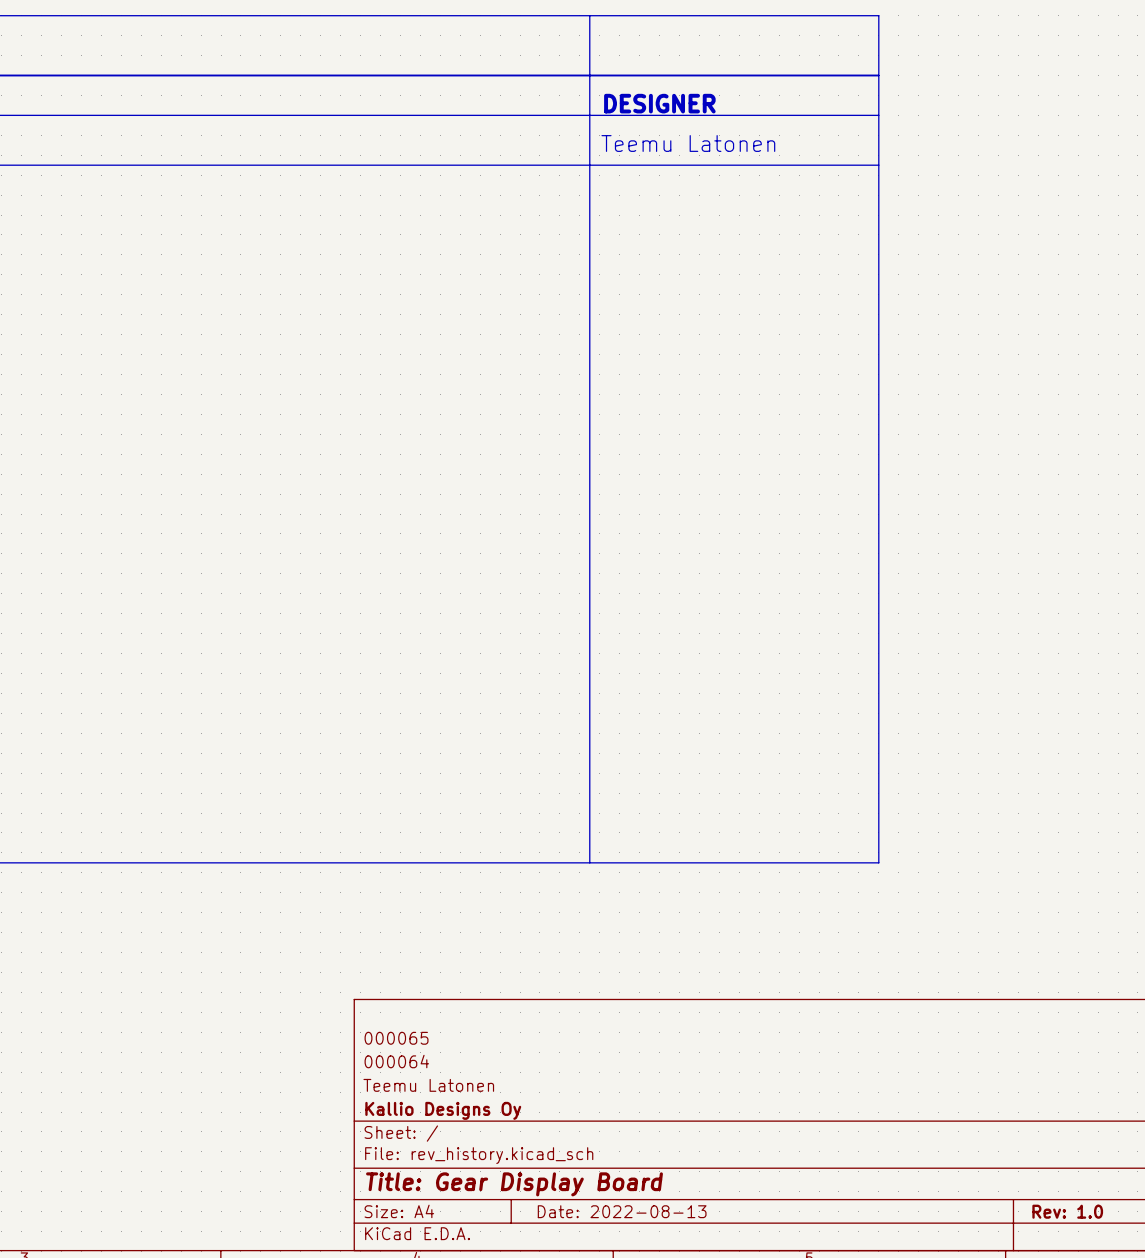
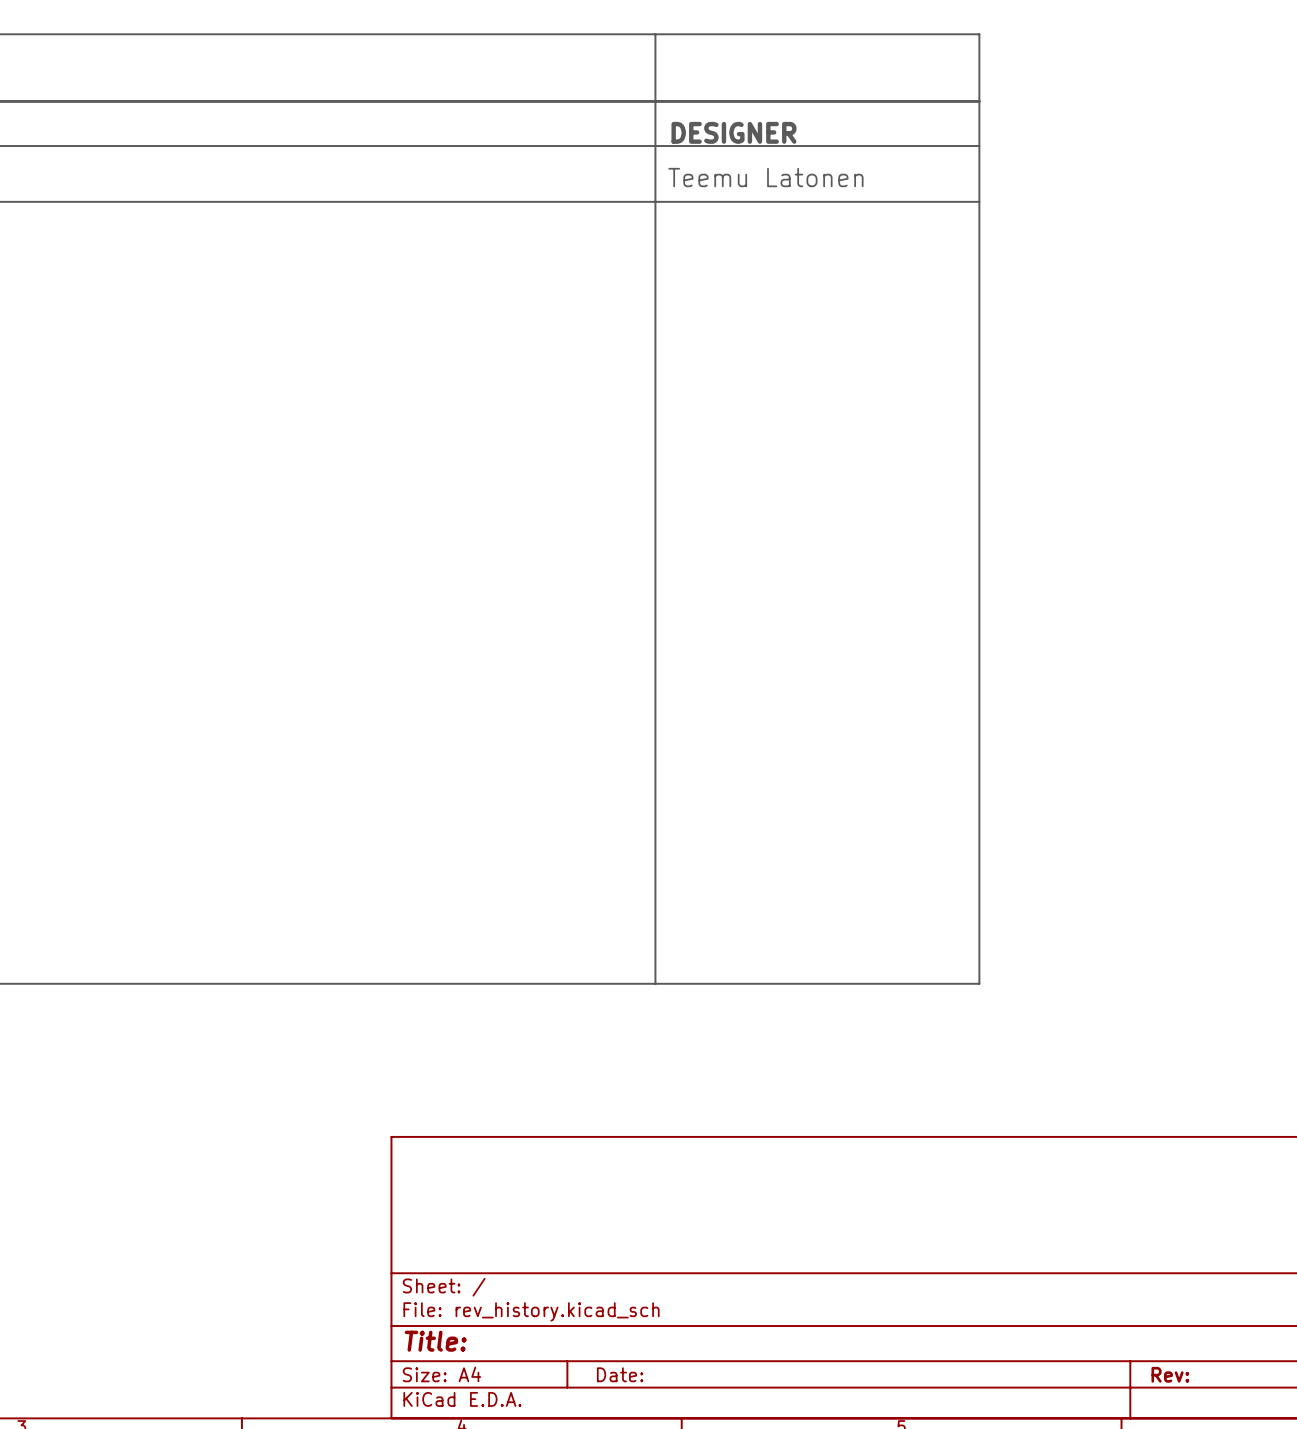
title block: 000065 (396, 1038) -> none
title block: 000064 (396, 1061) -> none
title block: Teemu Latonen (428, 1085) -> none
title block: Kallio Designs Oy (443, 1110) -> none
title block: Title: Gear Display Board (514, 1184) -> Title: (435, 1341)
title block: Date: 2022-08-13 (622, 1211) -> Date: (620, 1374)
title block: Rev: 1.0 (1067, 1211) -> Rev: (1170, 1374)

